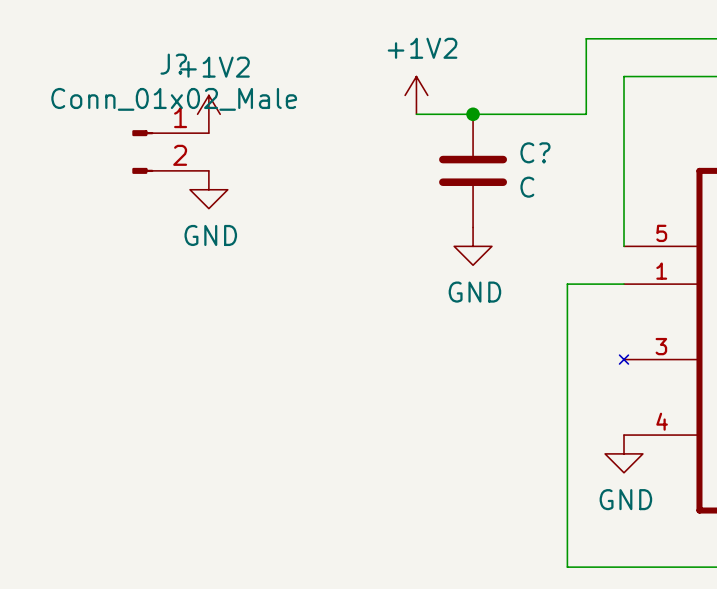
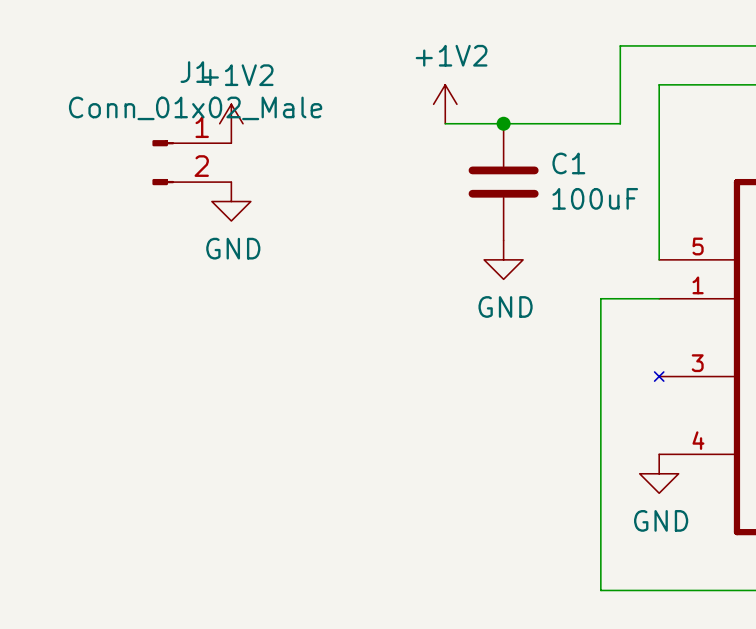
J? name: J? (173, 64) -> J1 (195, 72)
C? name: C? (535, 152) -> C1 (568, 163)
C? value: C (527, 187) -> 100uF (595, 198)

